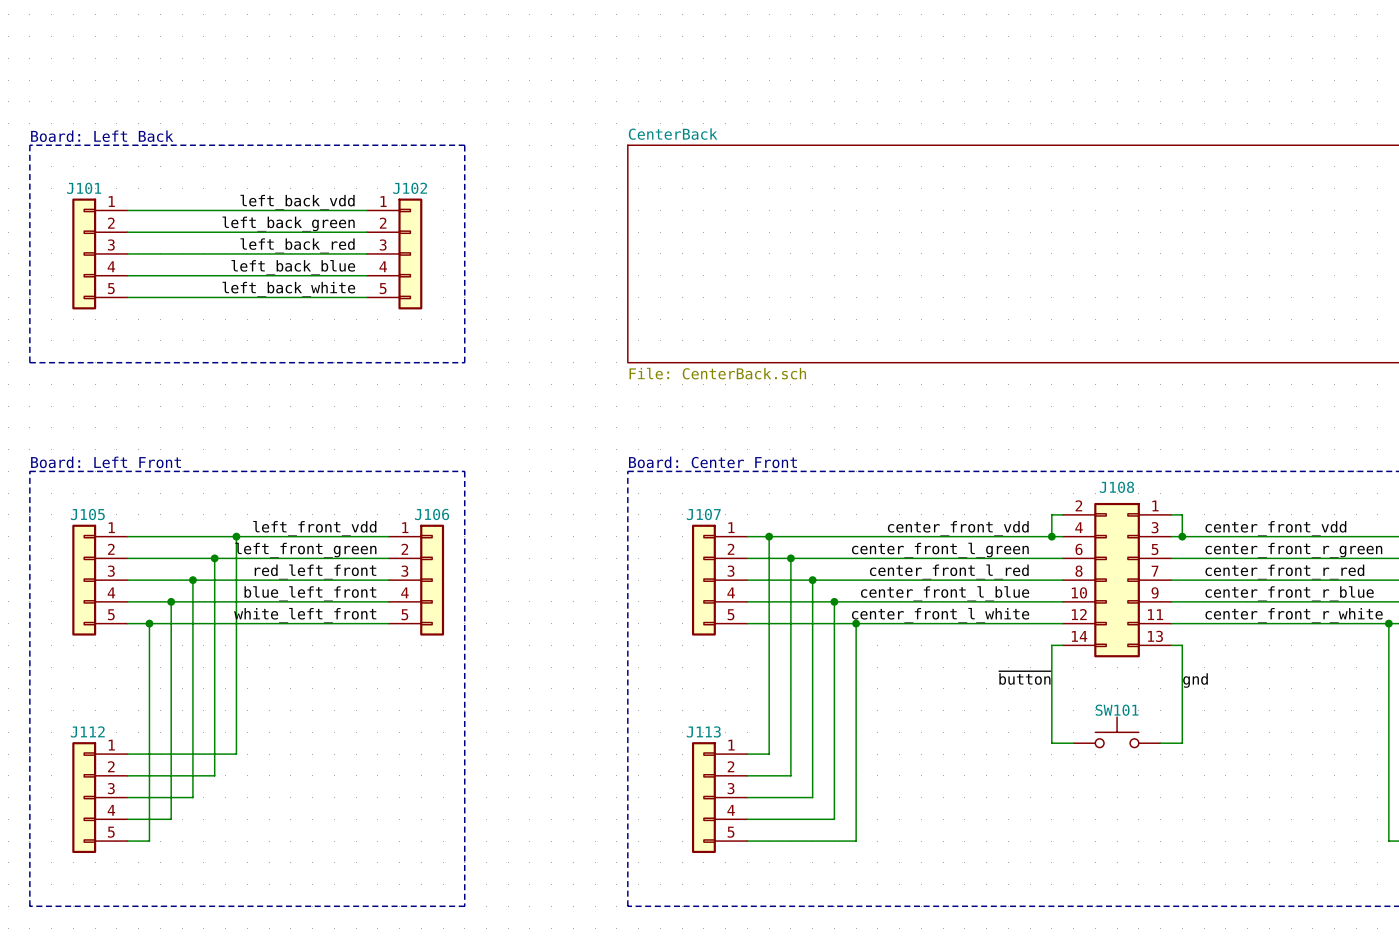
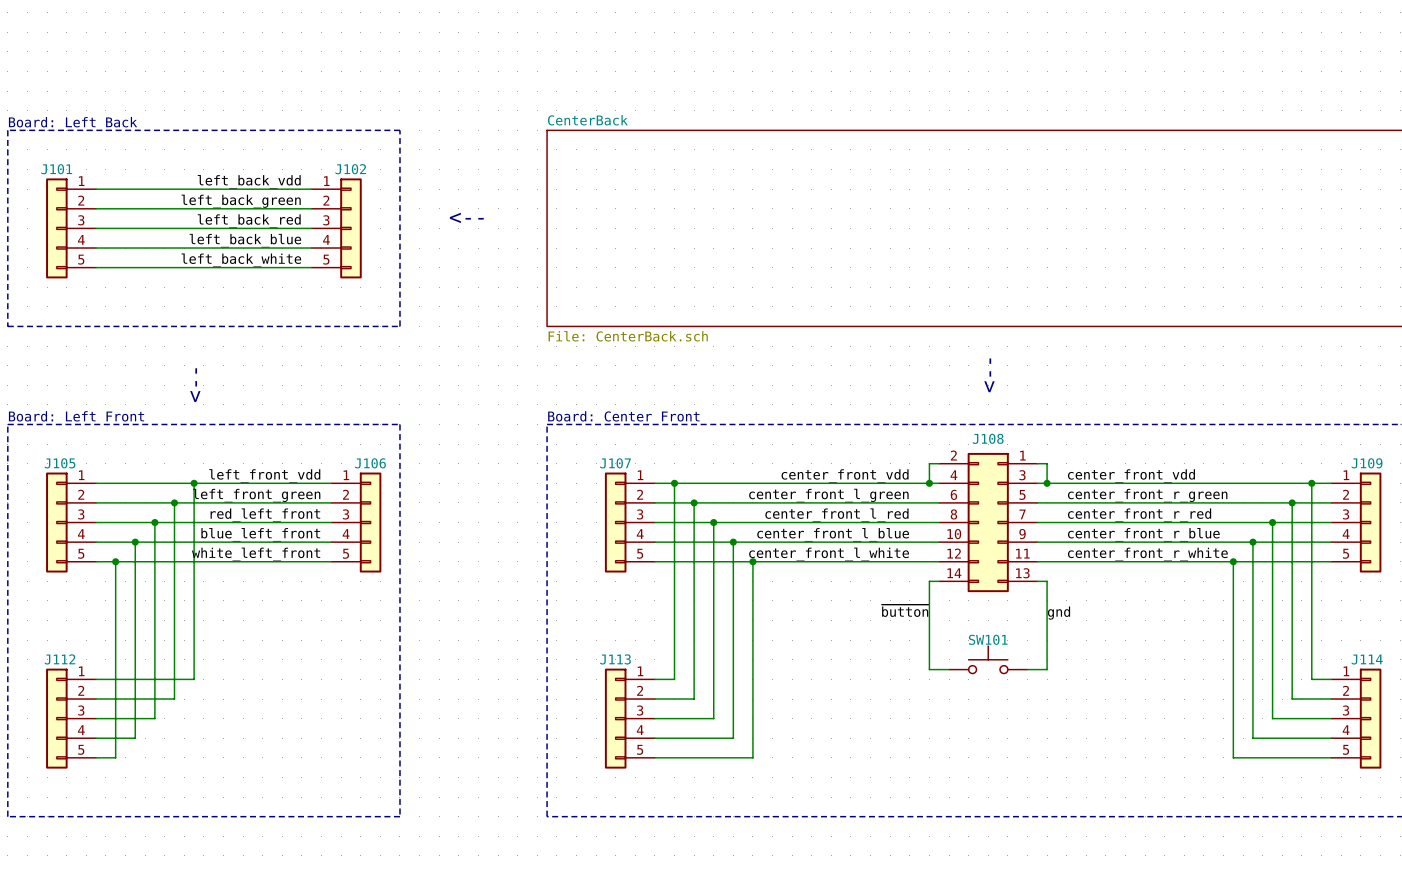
text: none -> <-- (466, 217)
text: none -> <-- (989, 375)
text: none -> <-- (195, 385)

